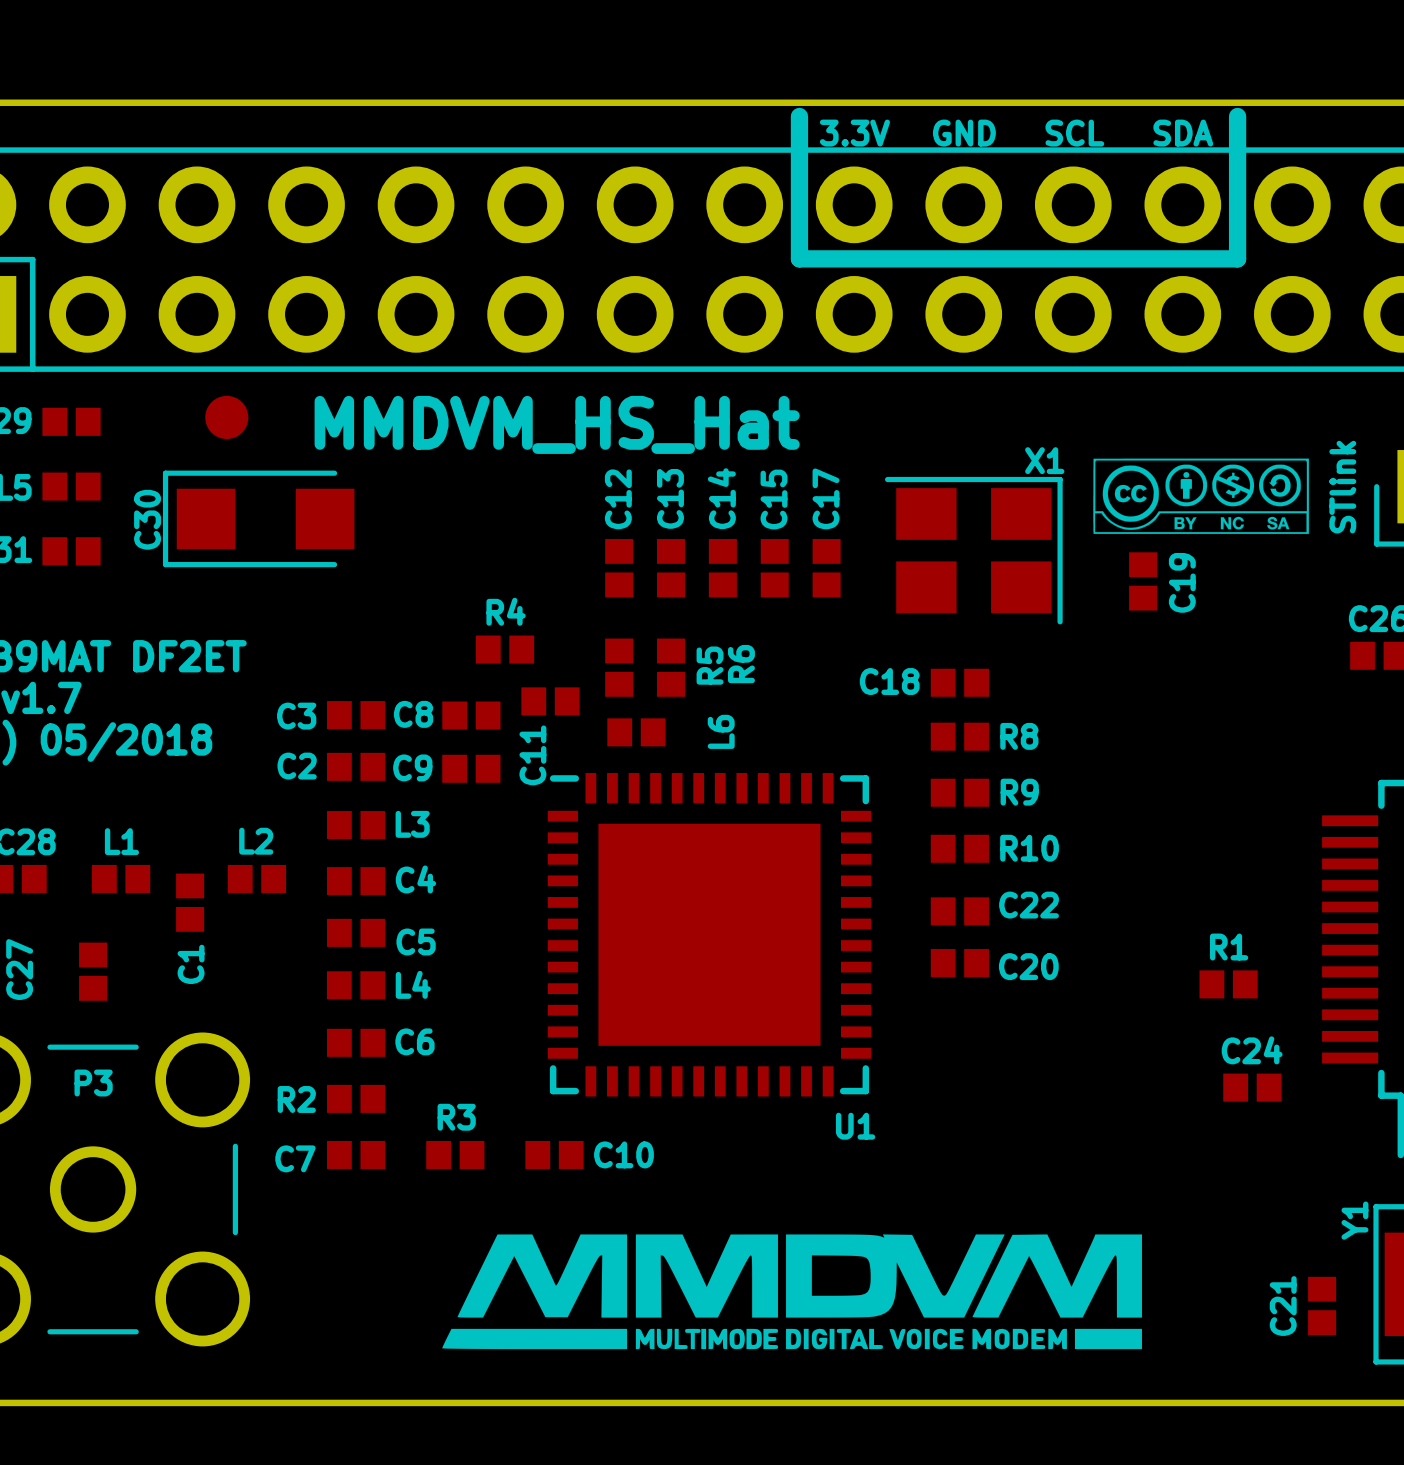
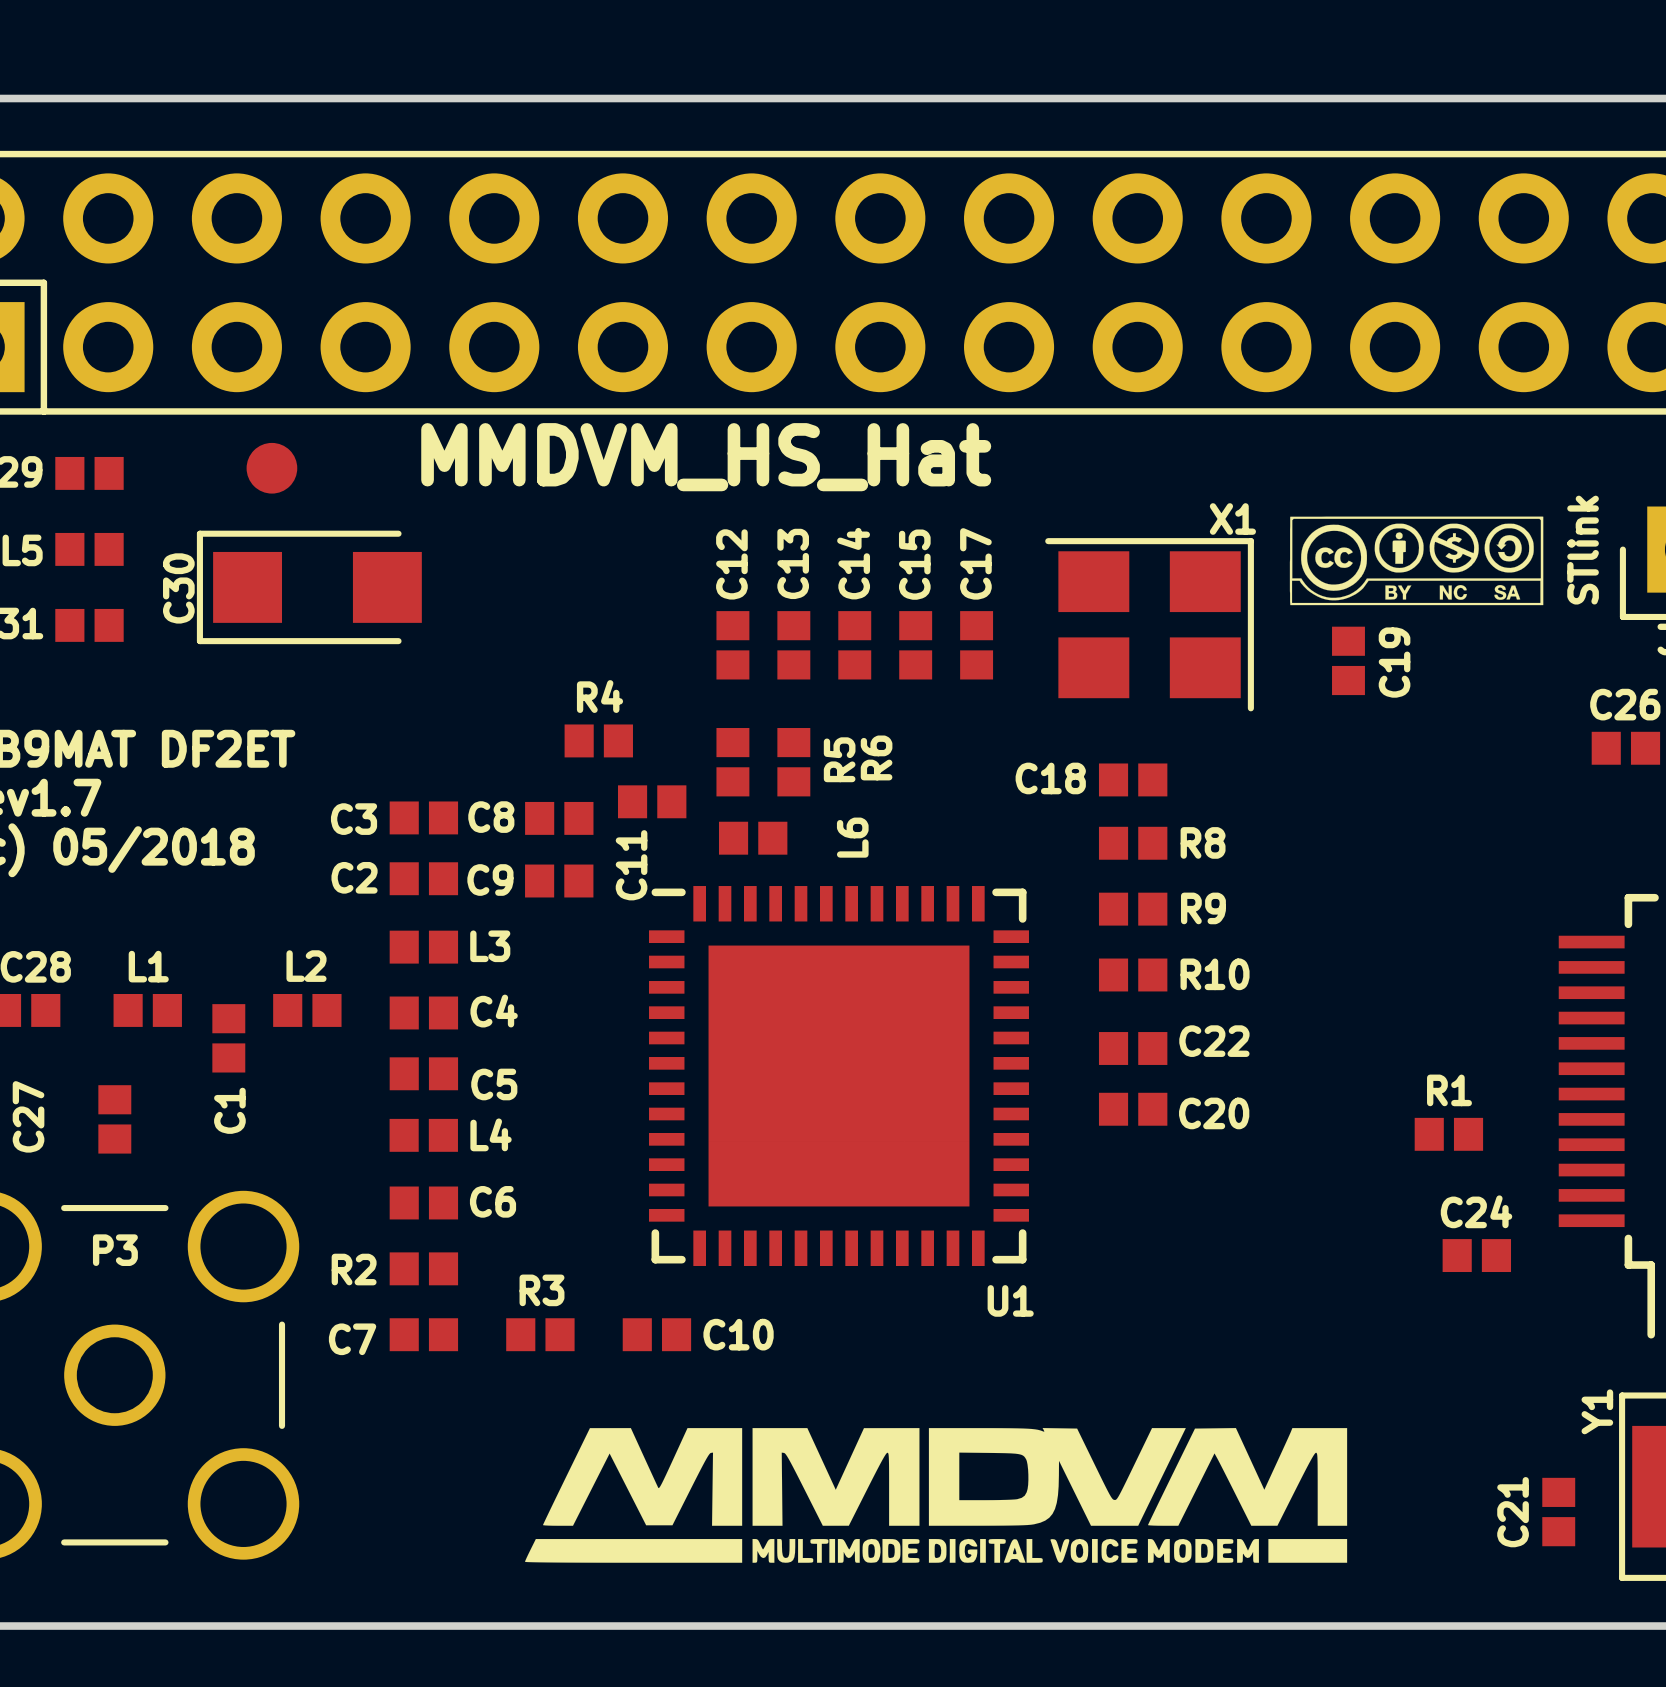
line: (799, 116) (799, 258) (1237, 258) (1237, 116) -> none
text: 3.3V (854, 133) -> none
text: GND (964, 133) -> none
text: SCL (1074, 133) -> none
text: SDA (1183, 133) -> none
text position: MMDVM_HS_Hat (557, 424) -> MMDVM_HS_Hat (706, 457)

